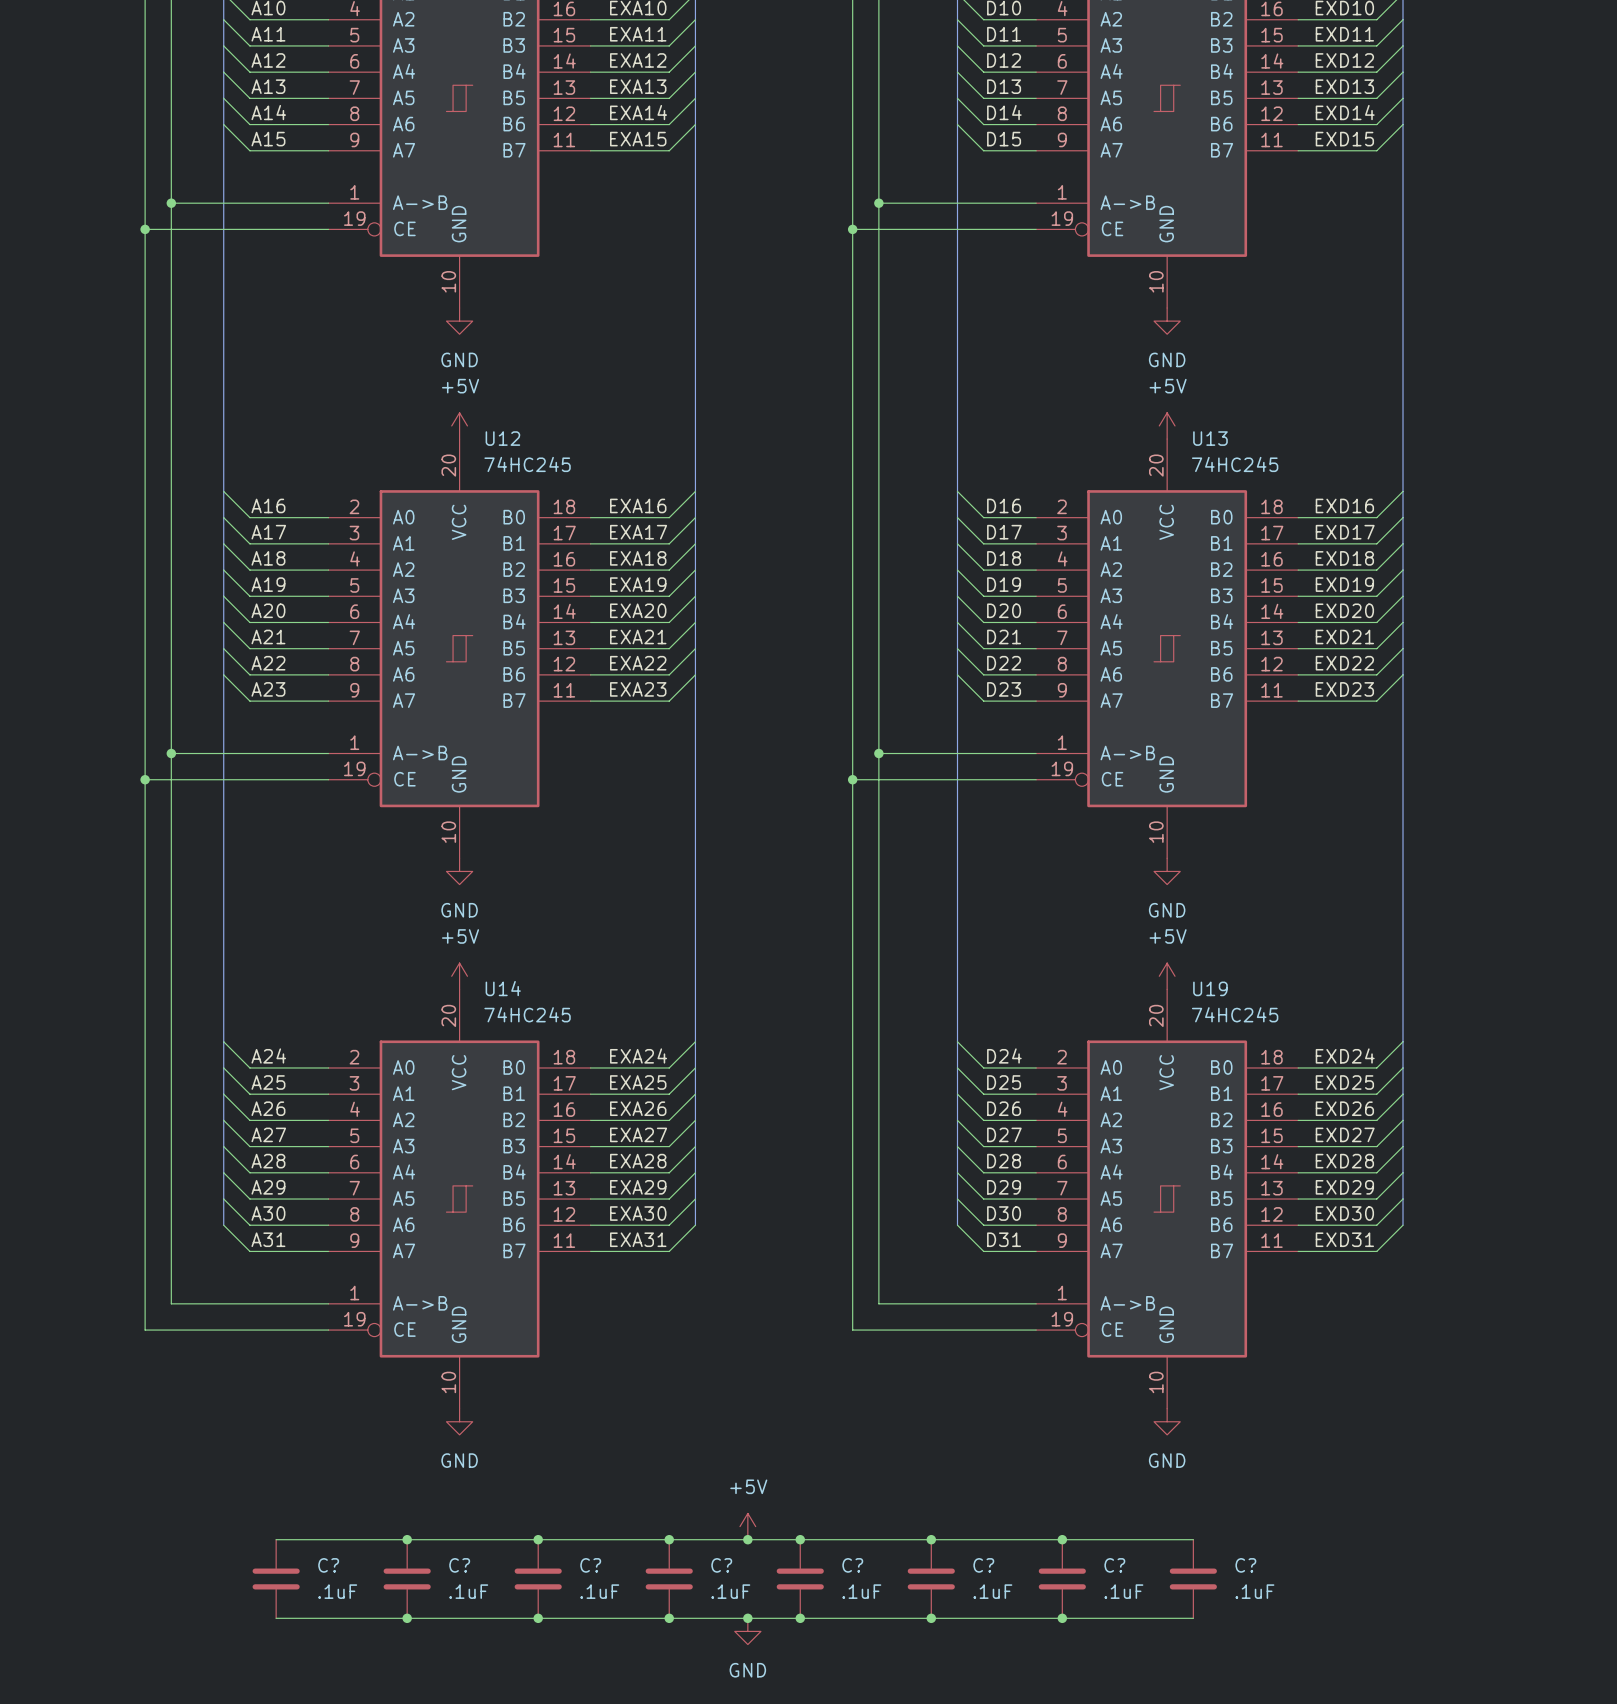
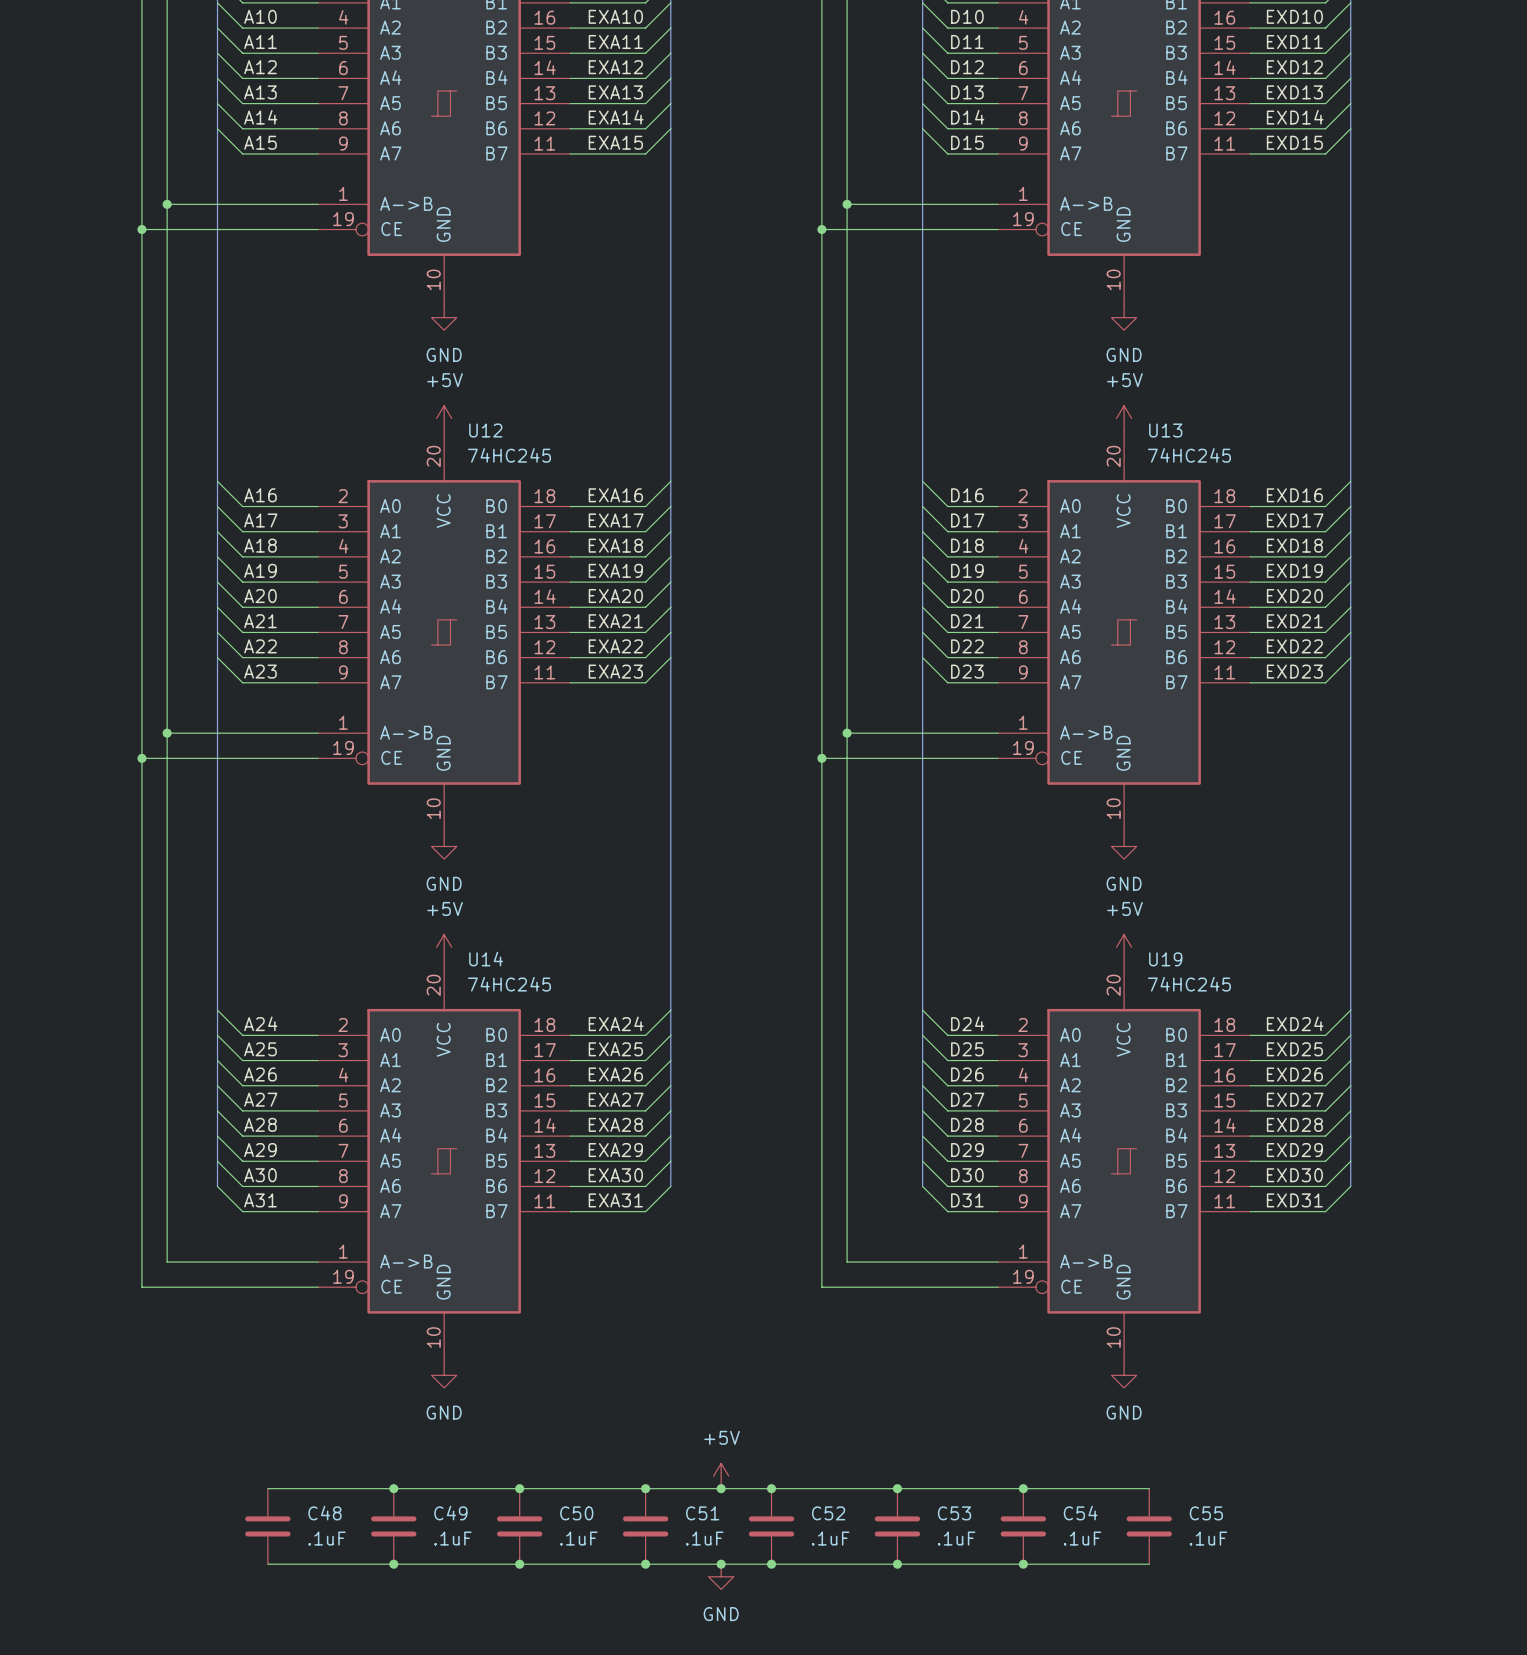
C? name: C? (328, 1565) -> C48 (324, 1513)
C? name: C? (459, 1565) -> C49 (450, 1513)
C? name: C? (590, 1565) -> C50 (576, 1513)
C? name: C? (721, 1565) -> C51 (702, 1513)
C? name: C? (852, 1565) -> C52 (828, 1513)
C? name: C? (983, 1565) -> C53 (954, 1513)
C? name: C? (1114, 1565) -> C54 (1080, 1513)
C? name: C? (1245, 1565) -> C55 (1206, 1513)

